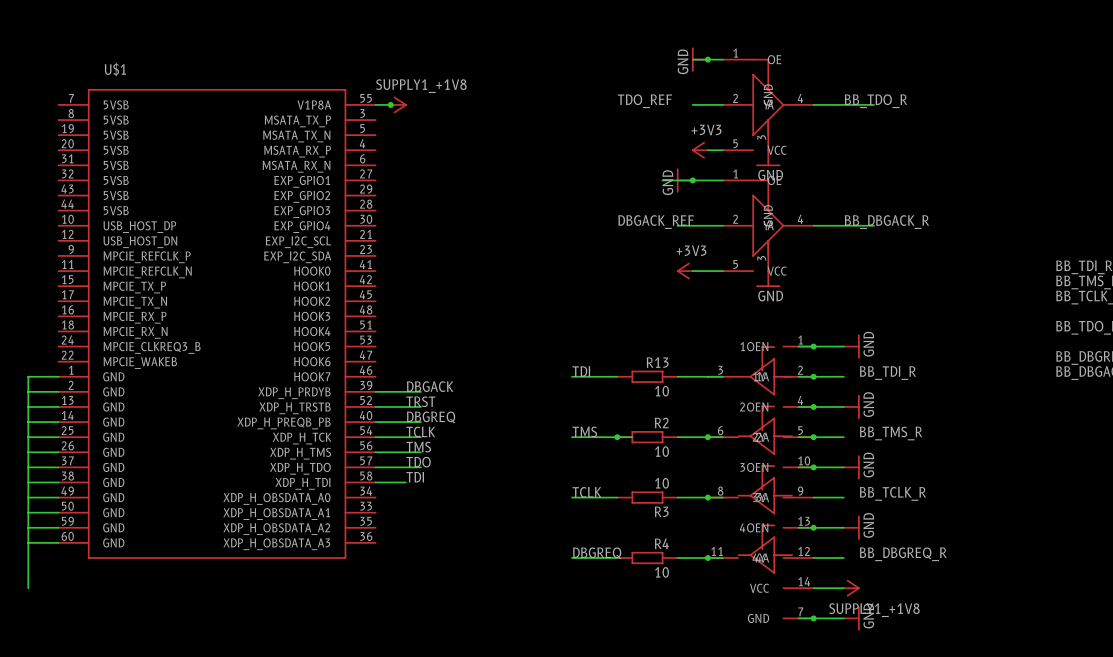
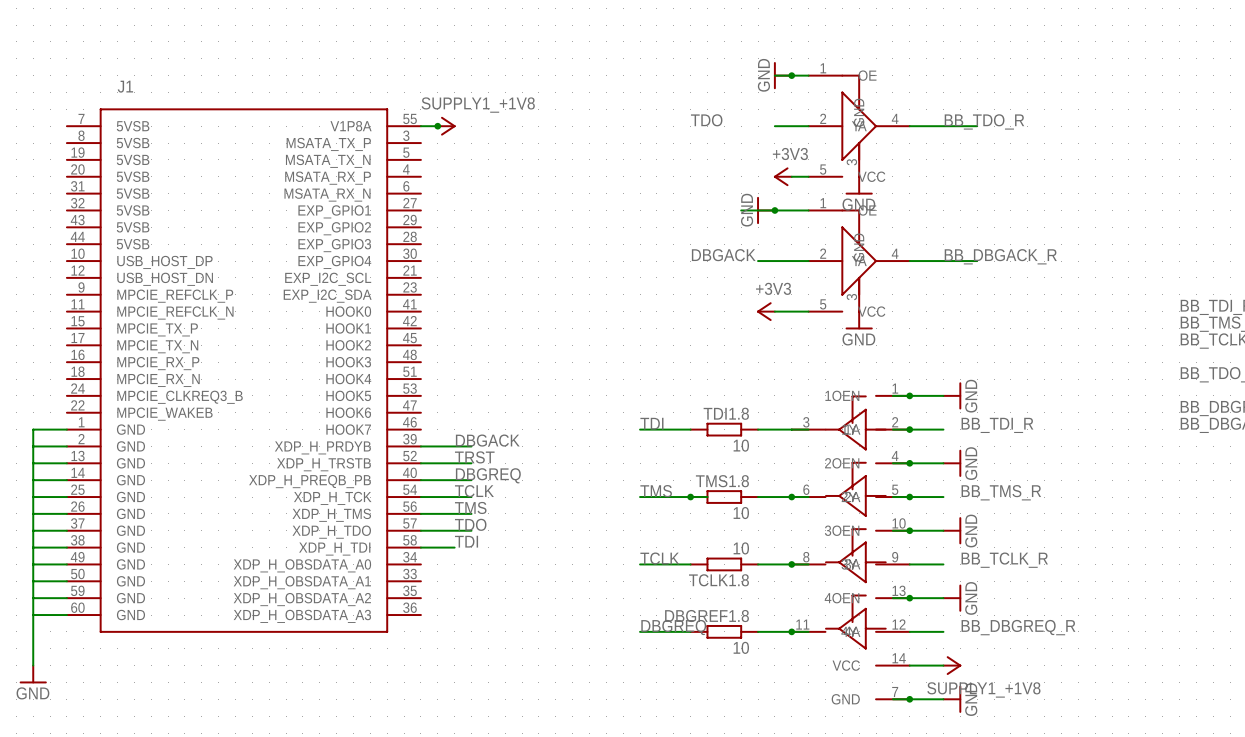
U$1 name: U$1 (115, 69) -> J1 (125, 86)
label: TDO_REF (644, 101) -> TDO (706, 120)
label: DBGACK_REF (656, 222) -> DBGACK (723, 255)
R13 name: R13 (657, 362) -> TDI1.8 (726, 413)
R2 name: R2 (661, 422) -> TMS1.8 (722, 481)
R3 name: R3 (661, 511) -> TCLK1.8 (718, 580)
R4 name: R4 (661, 543) -> DBGREF1.8 (707, 616)
power symbol: none -> GND (33, 674)

